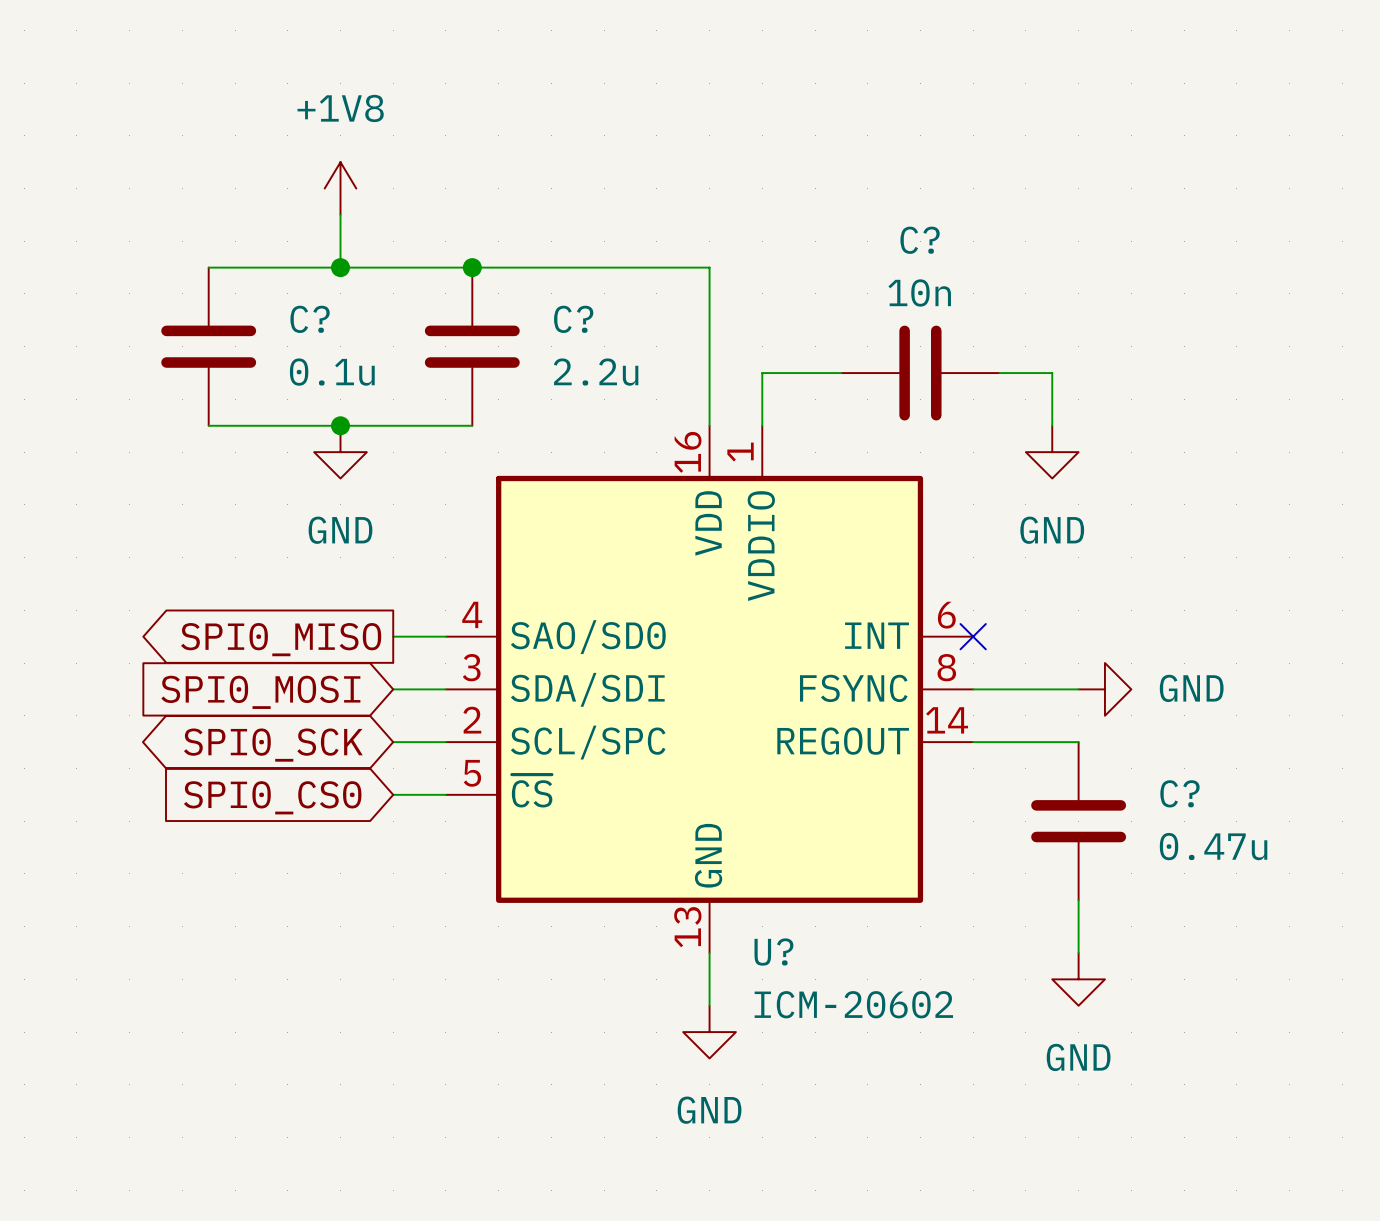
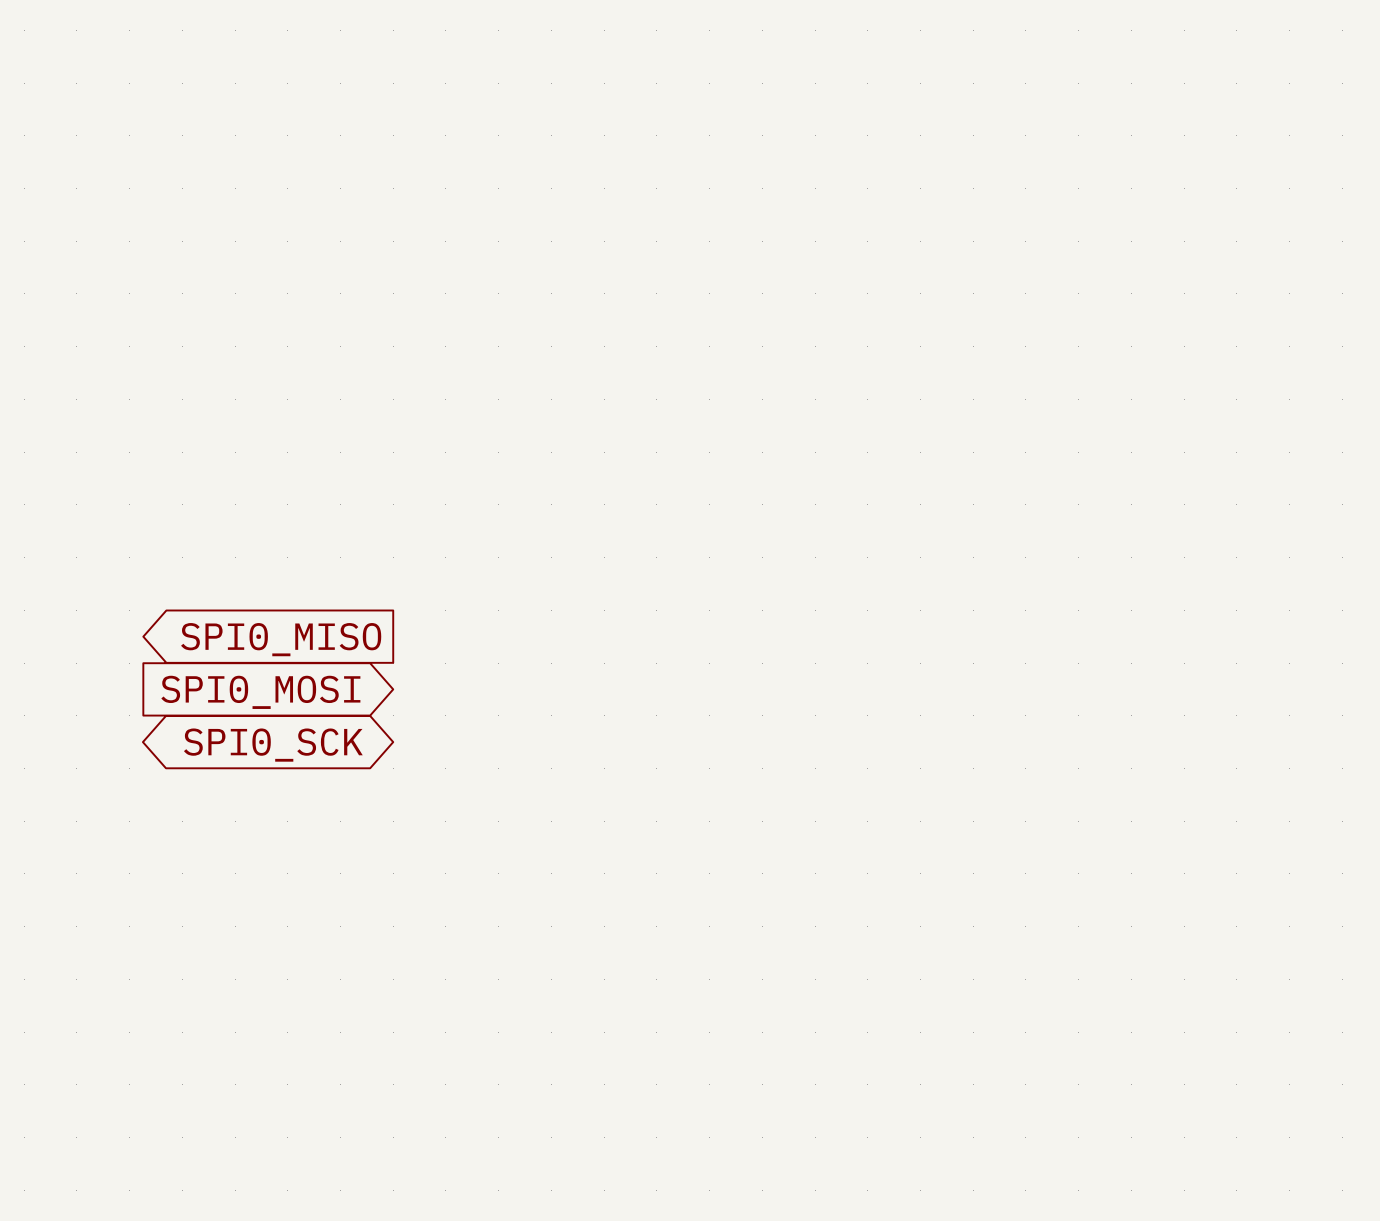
power symbol: +1V8 (340, 188) -> none
wire: (340, 214) (340, 267) -> none
wire: (208, 267) (709, 267) (709, 425) -> none
junction: (340, 267) -> none
junction: (472, 267) -> none
C?: 0.1u (208, 346) -> none
C?: 2.2u (472, 346) -> none
wire: (841, 373) (762, 373) (762, 425) -> none
C?: 10n (920, 373) -> none
wire: (999, 373) (1052, 373) (1052, 425) -> none
wire: (208, 425) (472, 425) -> none
junction: (340, 425) -> none
power symbol: GND (340, 452) -> none
power symbol: GND (1052, 452) -> none
wire: (393, 636) (445, 636) -> none
no-connect mark: (973, 636) -> none
wire: (393, 689) (445, 689) -> none
U?: ICM-20602 (709, 689) -> none
wire: (973, 689) (1078, 689) -> none
power symbol: GND (1104, 689) -> none
wire: (393, 742) (445, 742) -> none
wire: (973, 742) (1078, 742) -> none
wire: (393, 794) (445, 794) -> none
global label: SPI0_CS0 (272, 797) -> none
C?: 0.47u (1078, 821) -> none
wire: (1078, 900) (1078, 953) -> none
wire: (709, 953) (709, 1005) -> none
power symbol: GND (1078, 979) -> none
power symbol: GND (709, 1032) -> none

